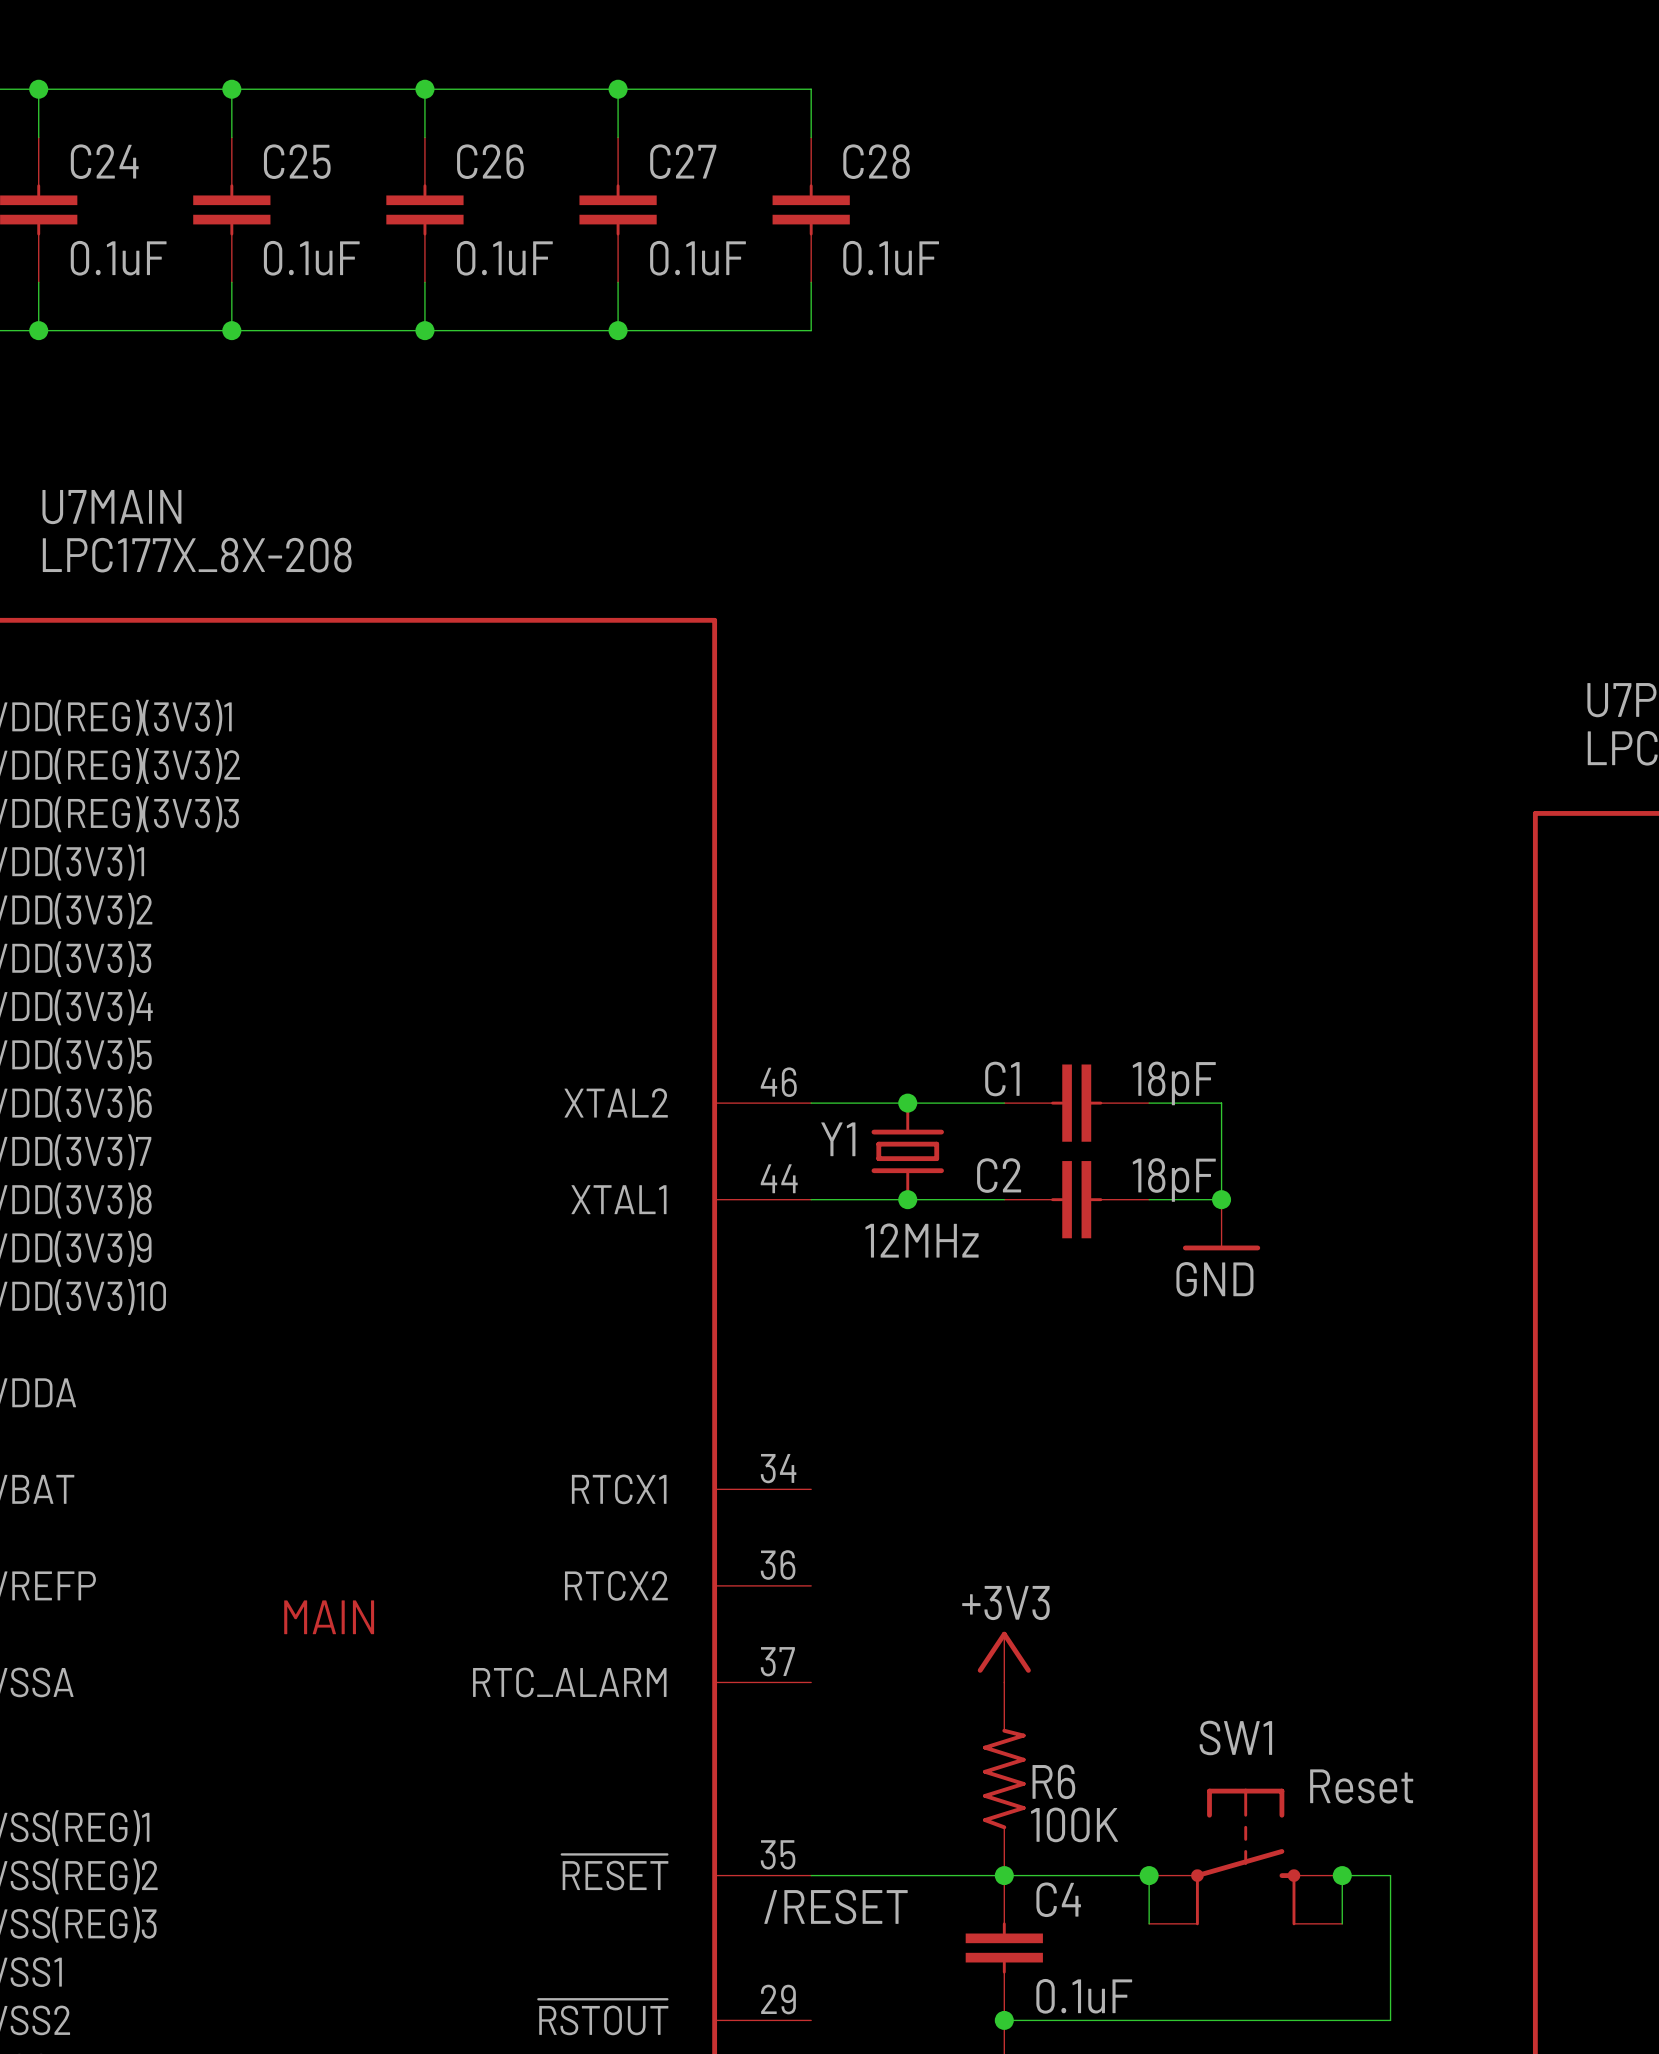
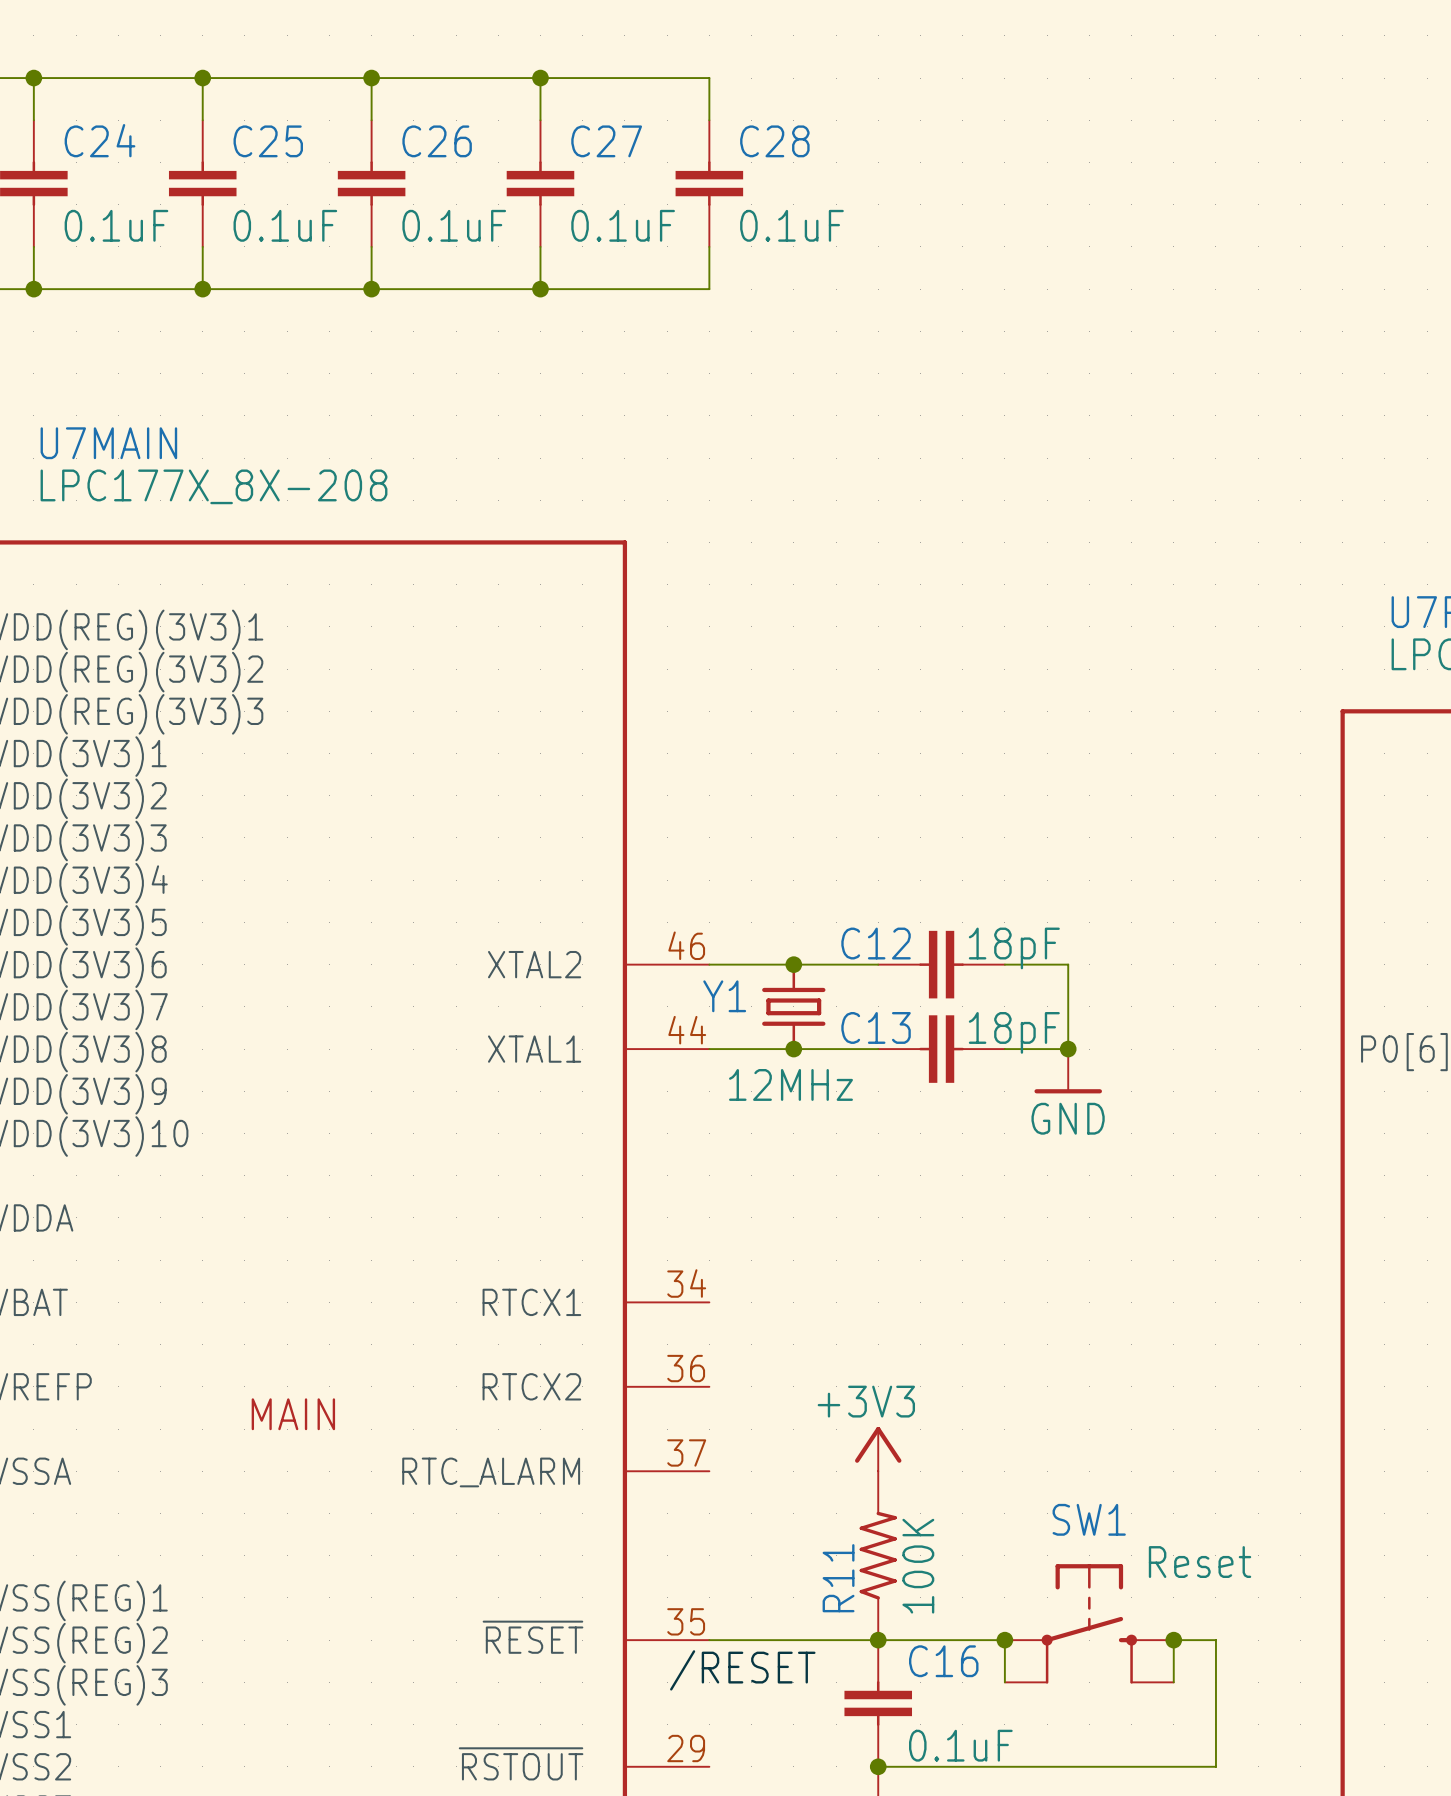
C1 name: C1 (1002, 1078) -> C12 (876, 943)
C2 name: C2 (999, 1175) -> C13 (876, 1027)
R6 name: R6 (1053, 1781) -> R11 (838, 1578)
R6 value rotation: 0° (1074, 1824) -> 90° counterclockwise (918, 1566)
C4 name: C4 (1058, 1899) -> C16 (943, 1661)

